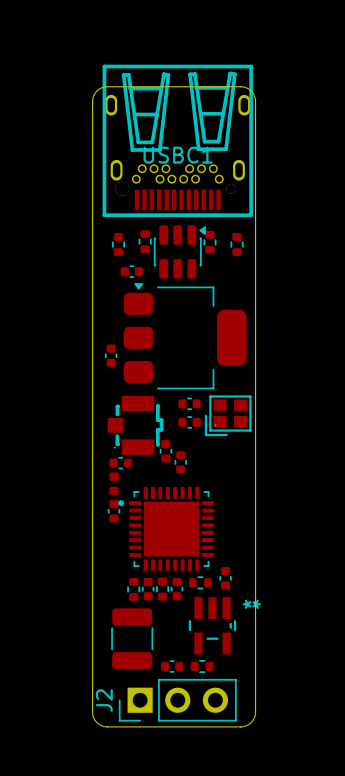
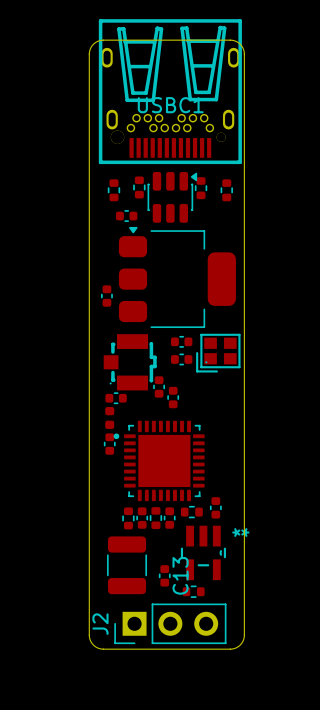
C13: none -> (164, 575)
part: (172, 666) -> none

